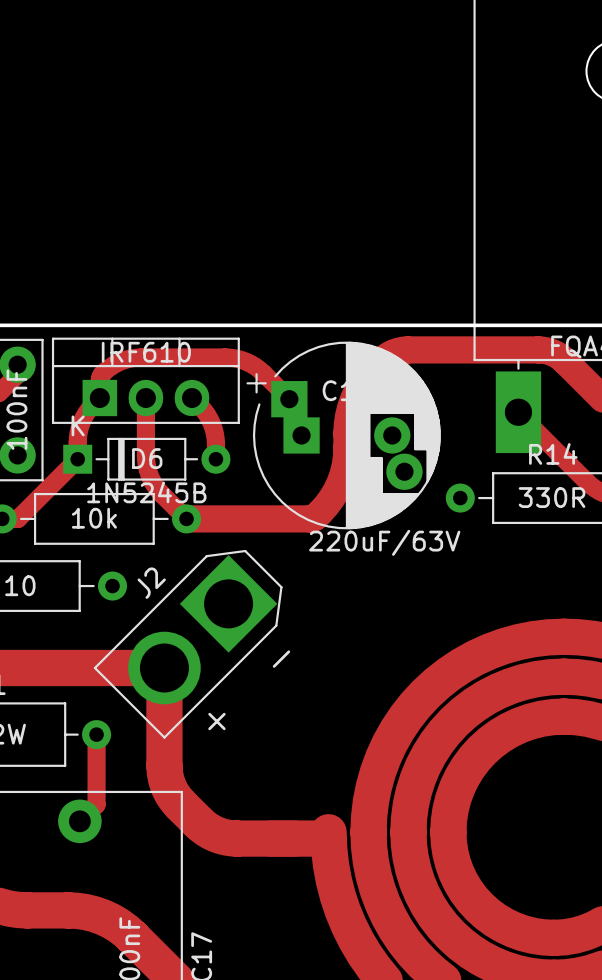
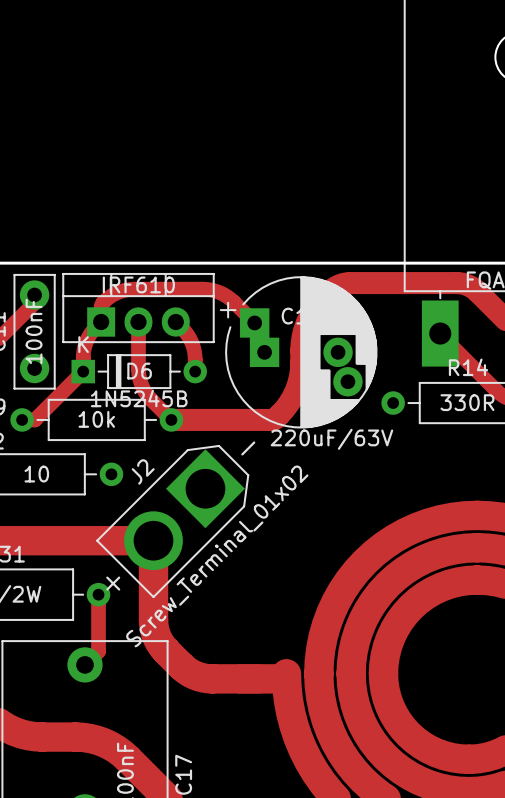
J2 text position: - (281, 659) -> - (248, 448)
J2 value: none -> Screw_Terminal_01x02 (217, 556)
J2 text position: + (216, 721) -> + (113, 583)

